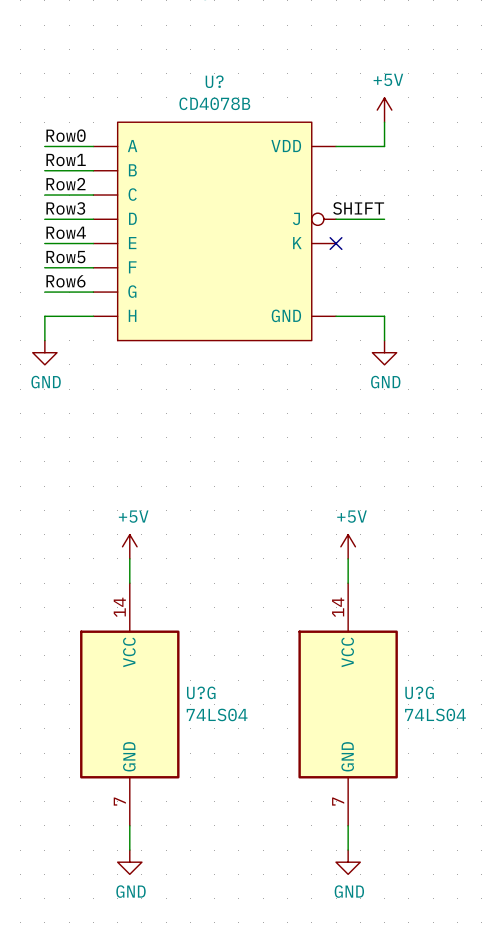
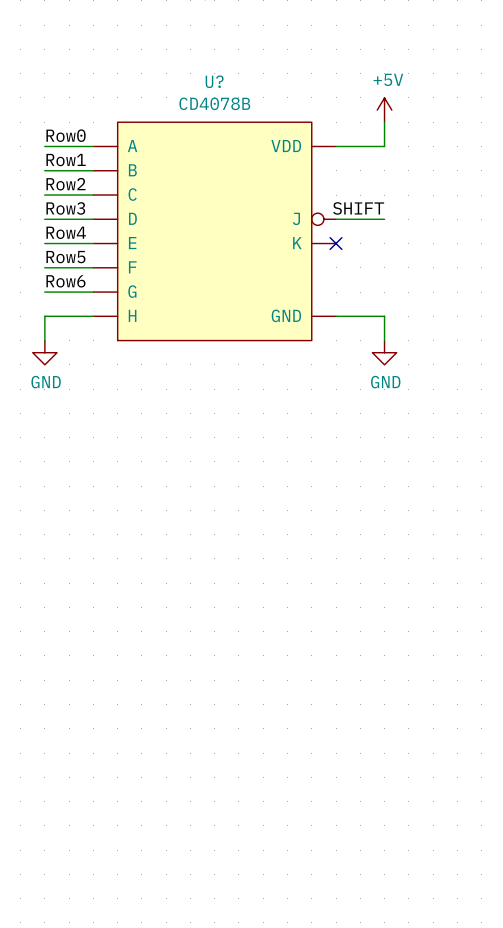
power symbol: +5V (129, 546) -> none
power symbol: +5V (348, 546) -> none
wire: (129, 558) (129, 583) -> none
wire: (348, 558) (348, 583) -> none
U?G: 74LS04 (129, 704) -> none
U?G: 74LS04 (348, 704) -> none
wire: (129, 825) (129, 850) -> none
wire: (348, 825) (348, 850) -> none
power symbol: GND (129, 862) -> none
power symbol: GND (348, 862) -> none

